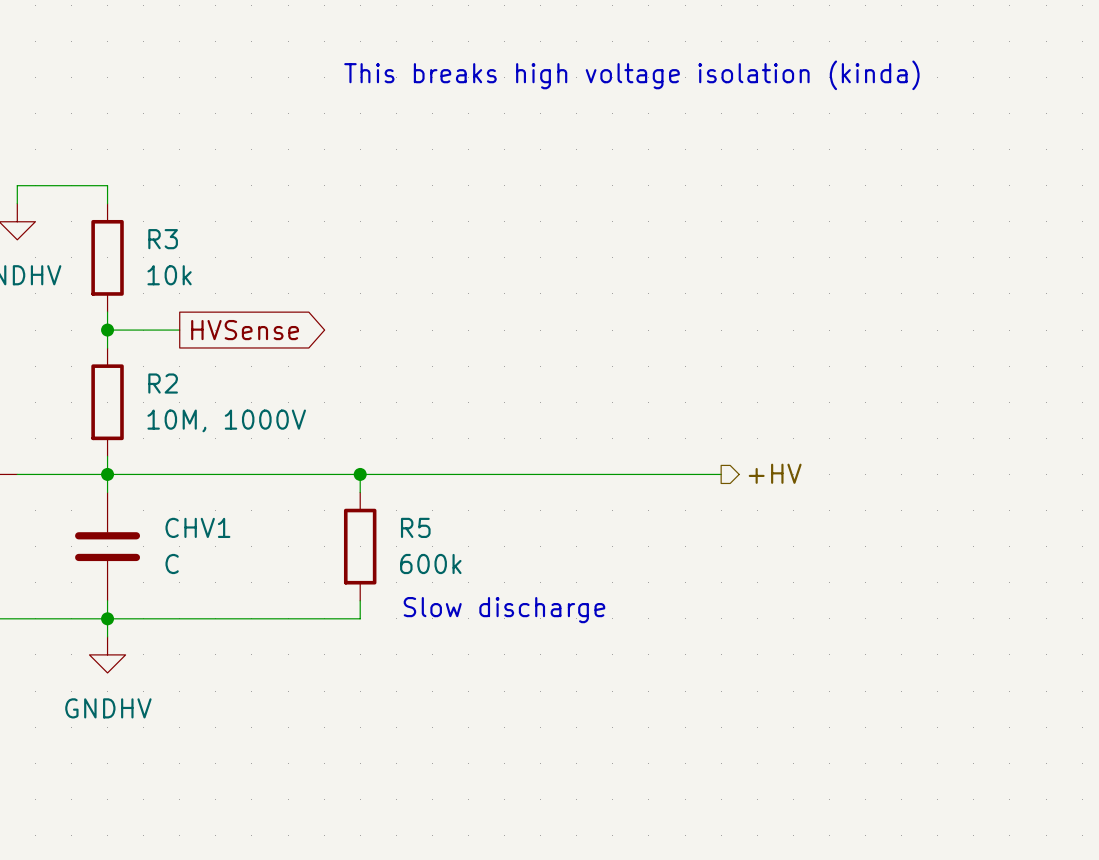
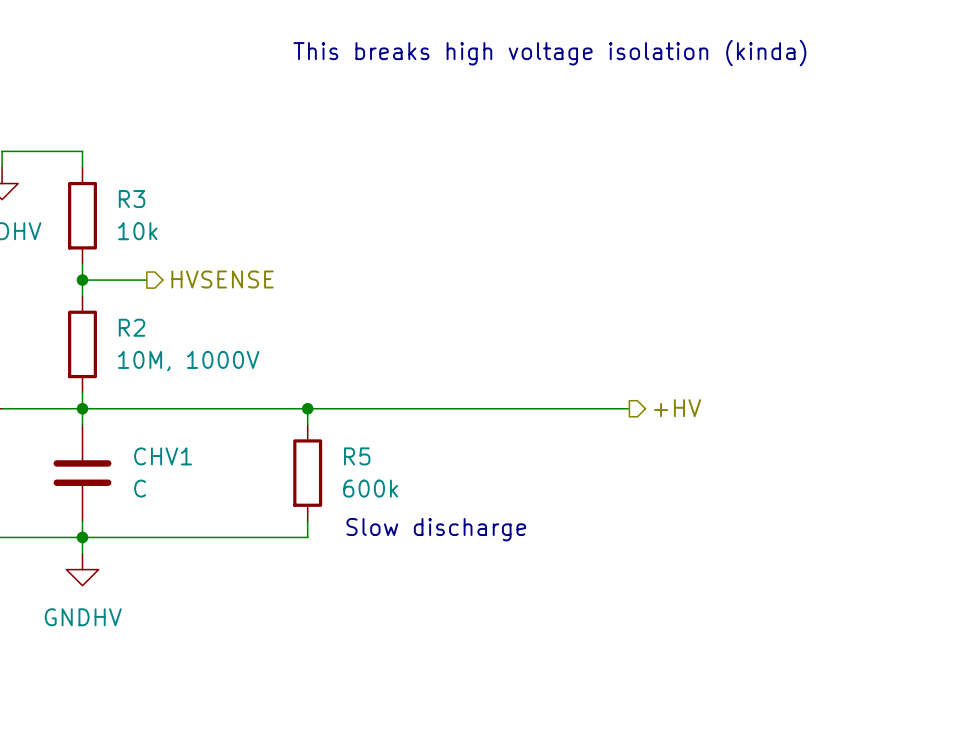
hierarchical label: none -> HVSENSE (222, 279)
global label: HVSense (245, 330) -> none

